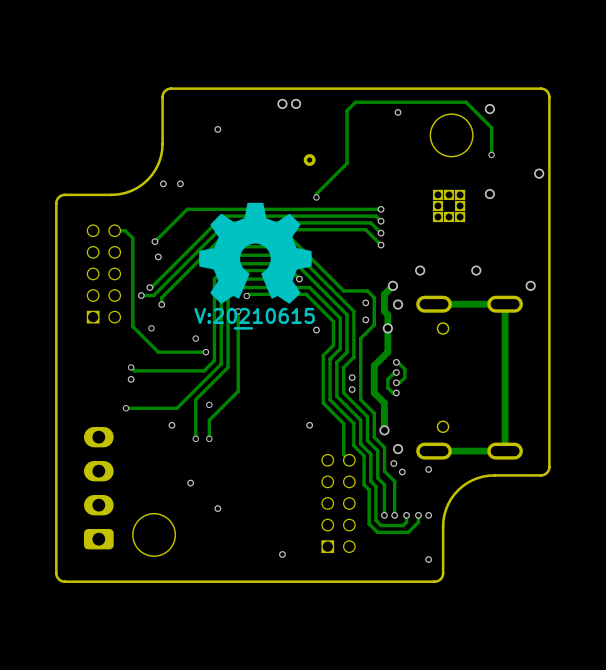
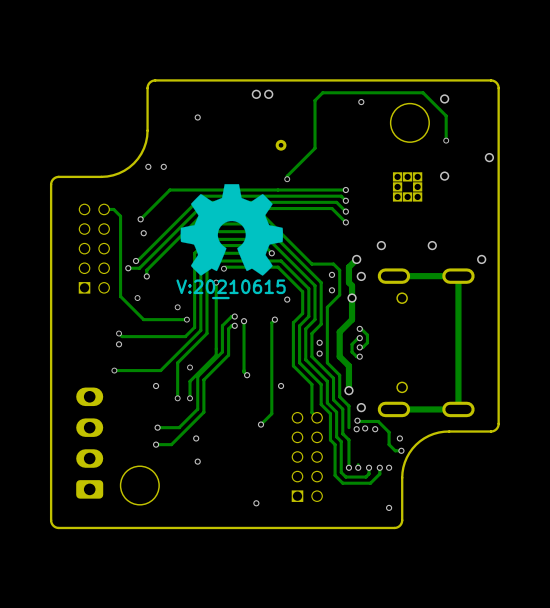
track: none -> (234, 316) (231, 316) (222, 325) (222, 352) (197, 376) (197, 409) (179, 427) (157, 427)
via: none -> (234, 316)
track: none -> (274, 319) (271, 322) (271, 413) (260, 424)
via: none -> (274, 319)
track: none -> (244, 321) (244, 372) (247, 375)
via: none -> (244, 321)
track: none -> (234, 325) (228, 328) (228, 355) (203, 379) (203, 412) (171, 444) (156, 444)
via: none -> (234, 325)
via: none -> (247, 375)
track: none -> (356, 419) (378, 421) (389, 432) (389, 444) (395, 450) (401, 450)
via: none -> (260, 424)
via: (428, 469) -> none
via: none -> (157, 427)
track: (384, 471) (394, 481) (394, 511) -> none
via: none -> (356, 429)
via: none -> (375, 429)
via: (190, 483) -> none
via: none -> (196, 438)
via: none -> (399, 438)
via: none -> (156, 444)
via: none -> (401, 450)

